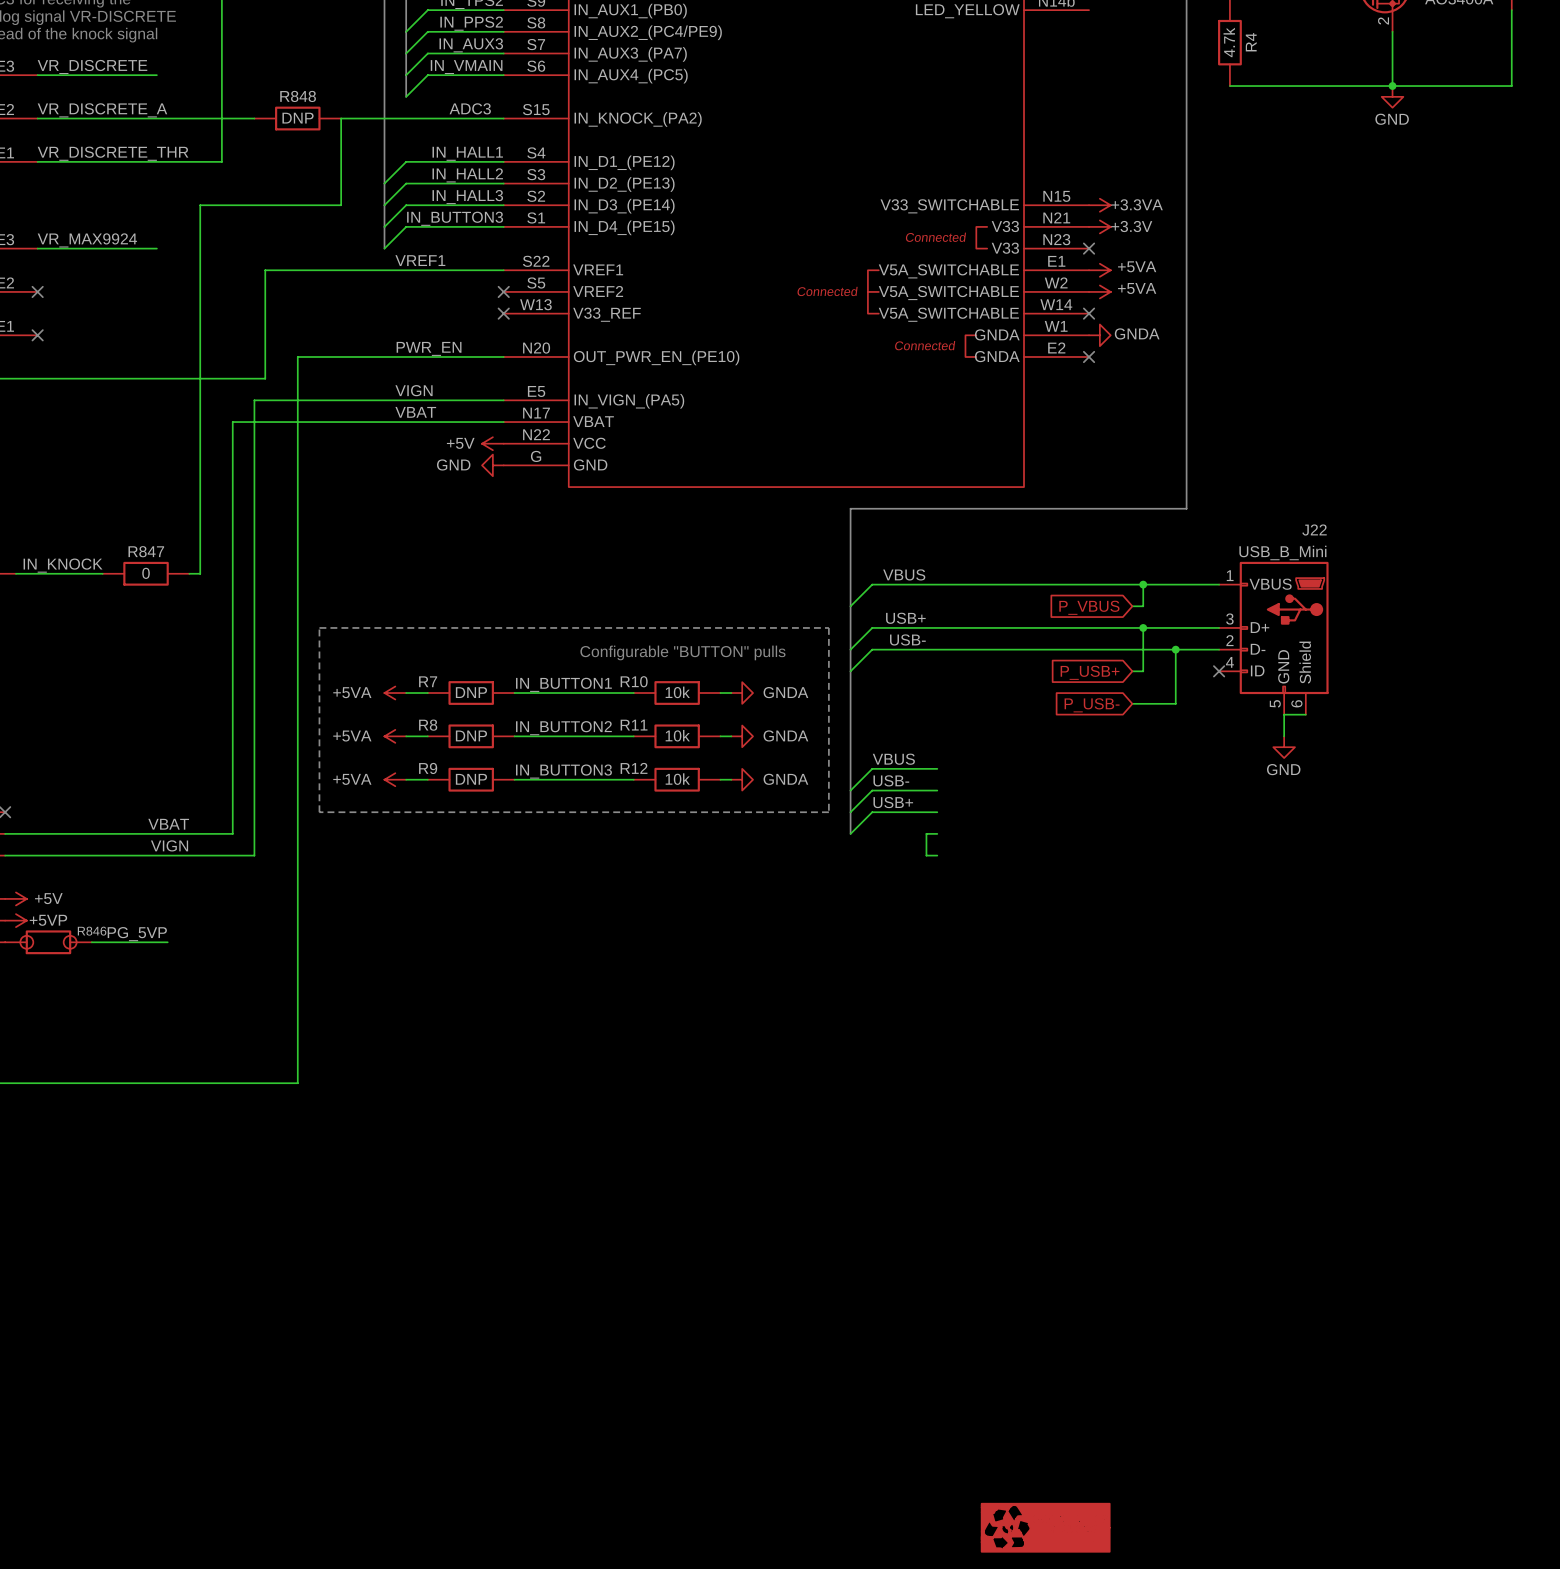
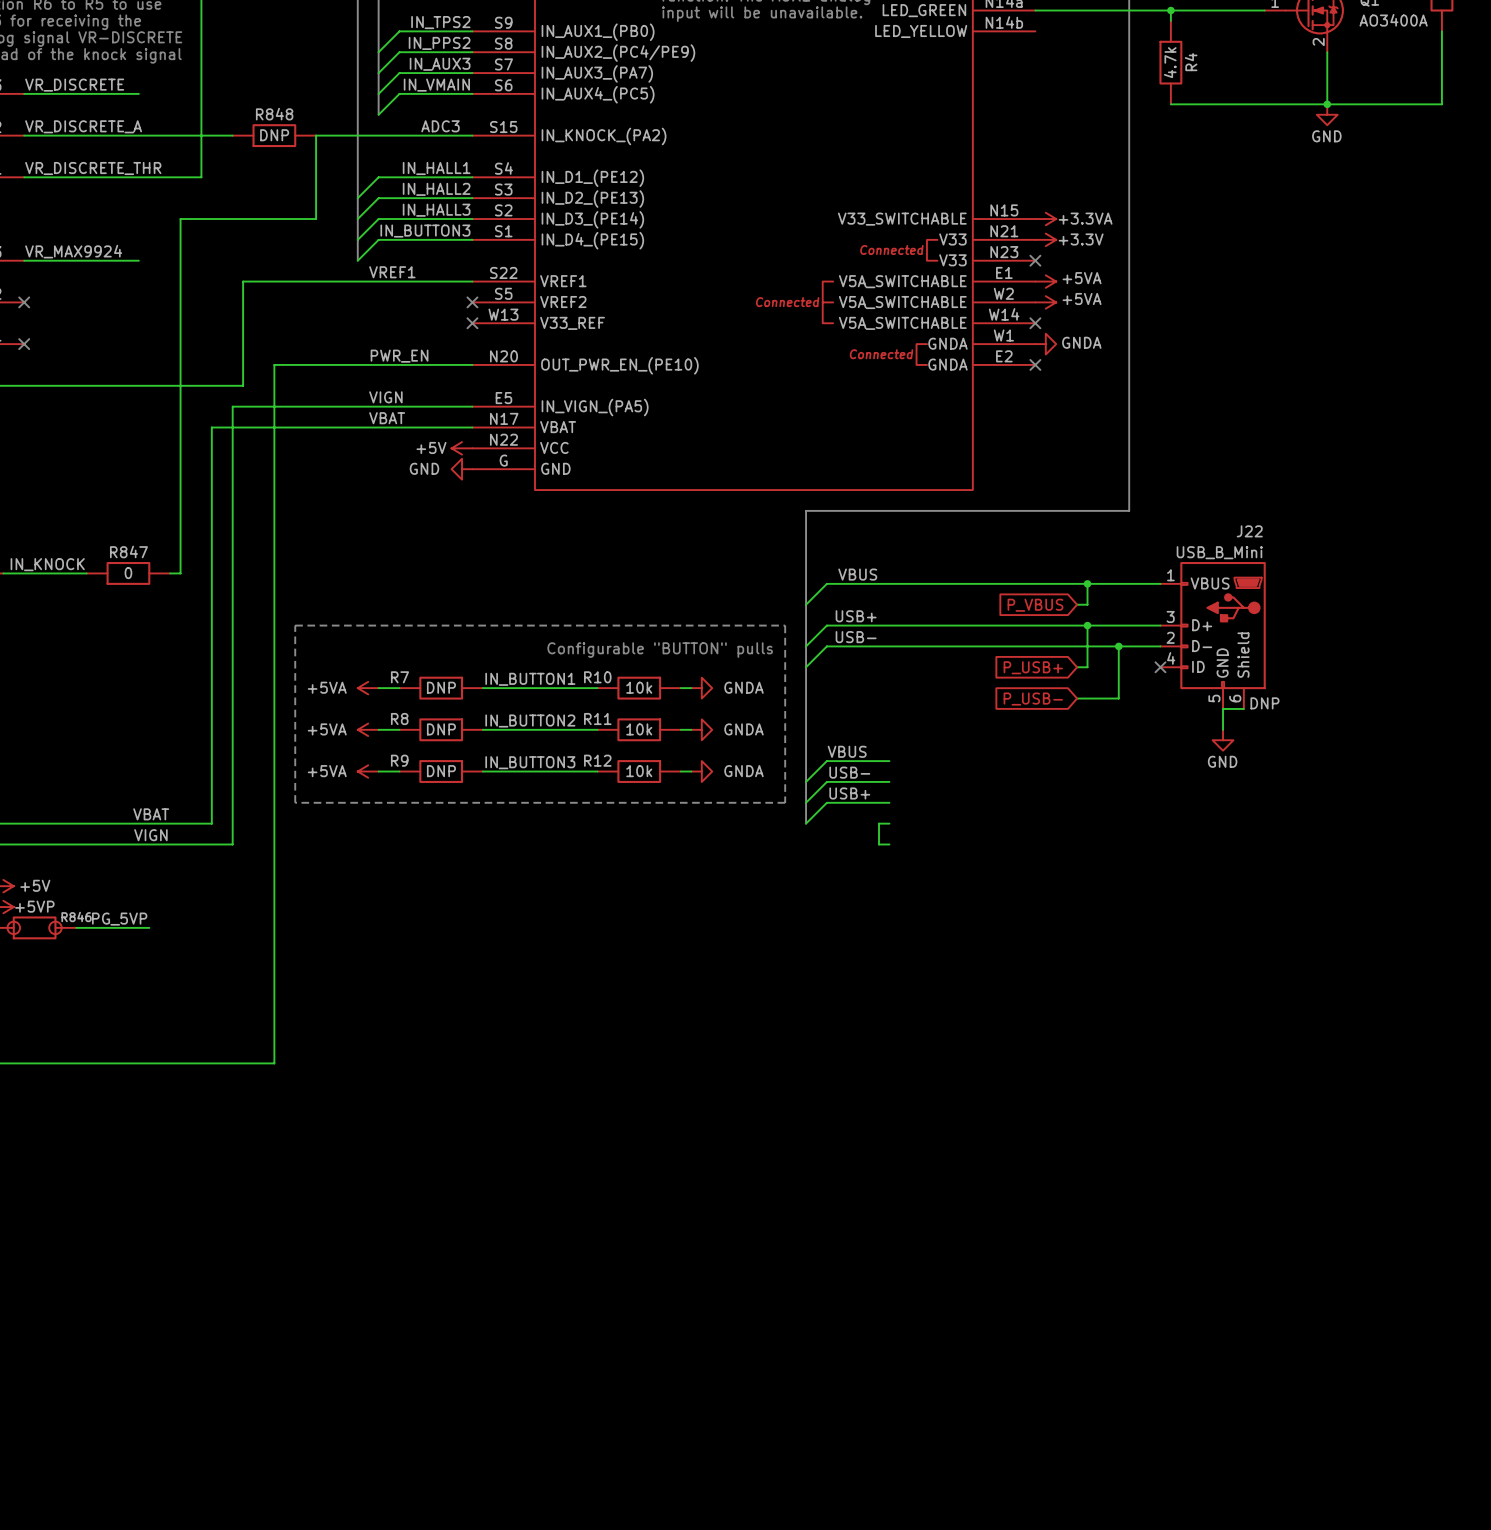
J22 text: none -> DNP (1264, 703)
power symbol: (1045, 1527) -> none

